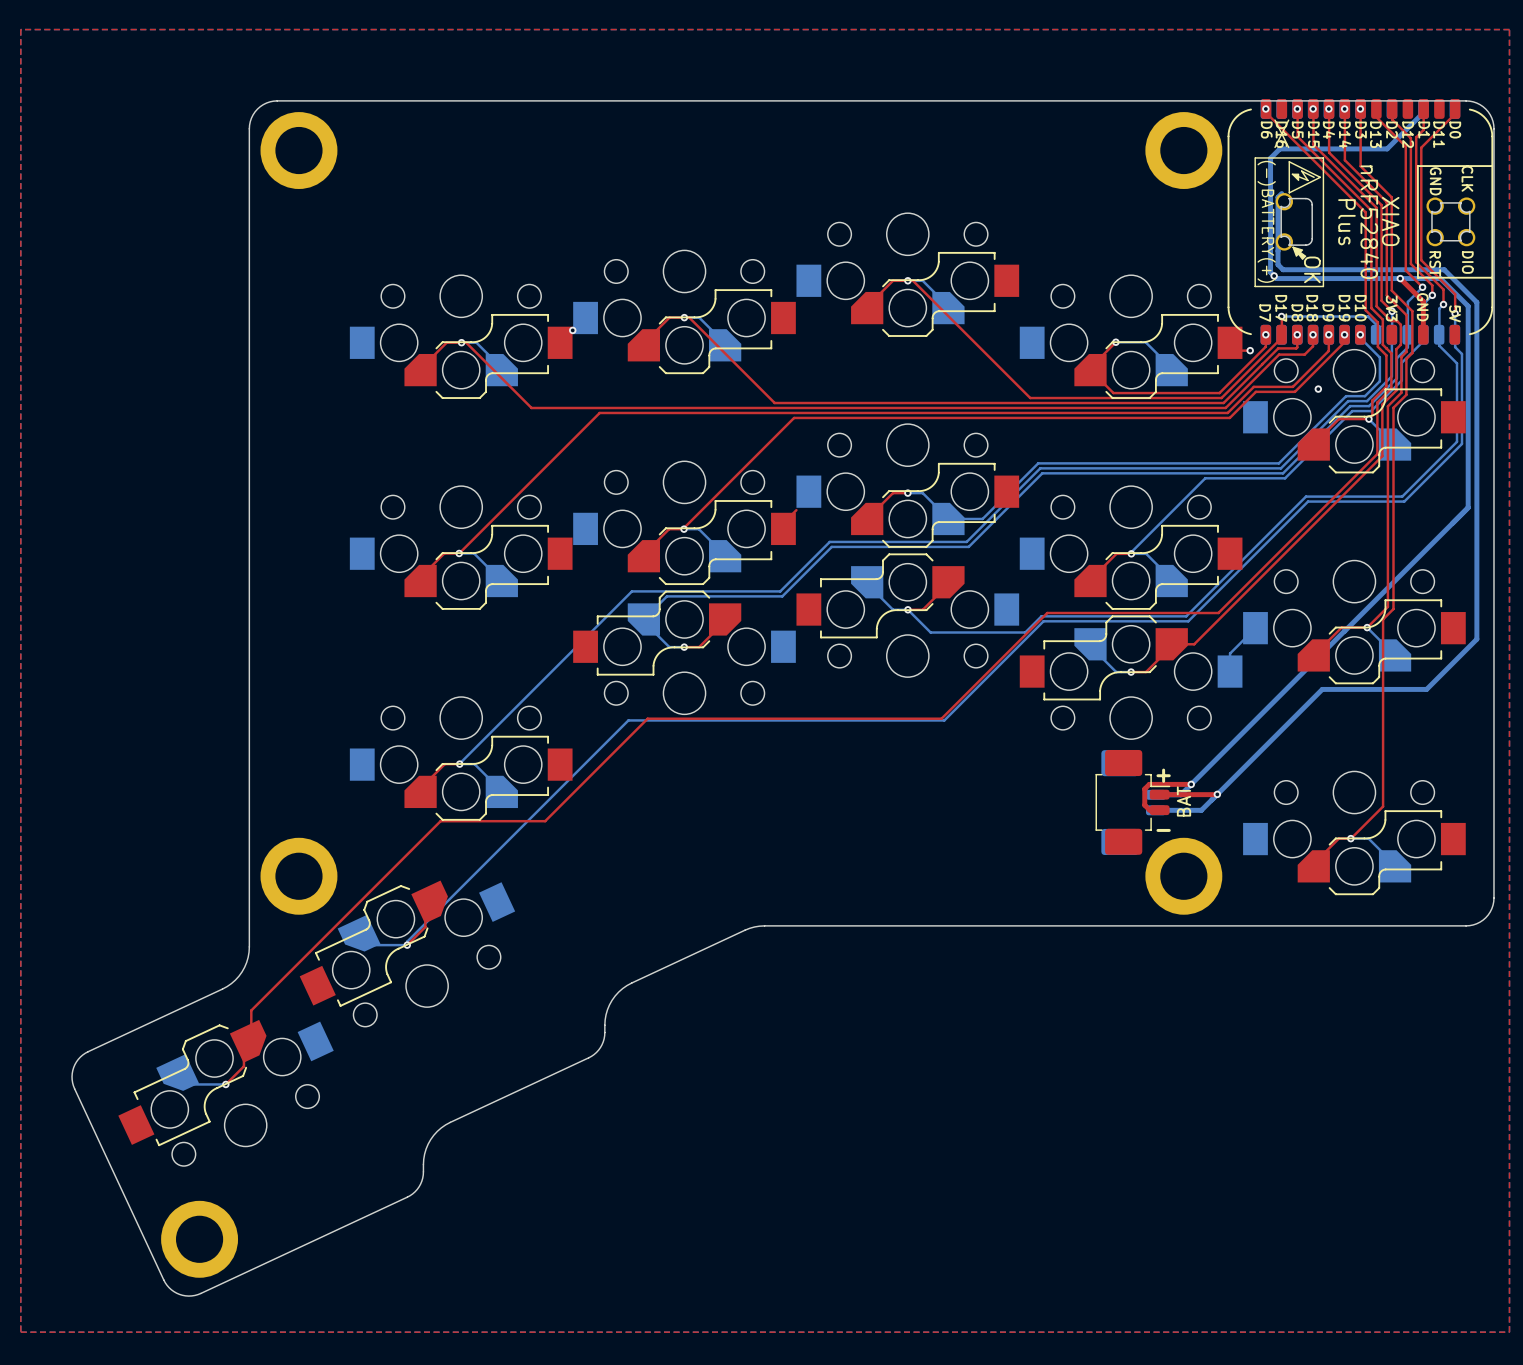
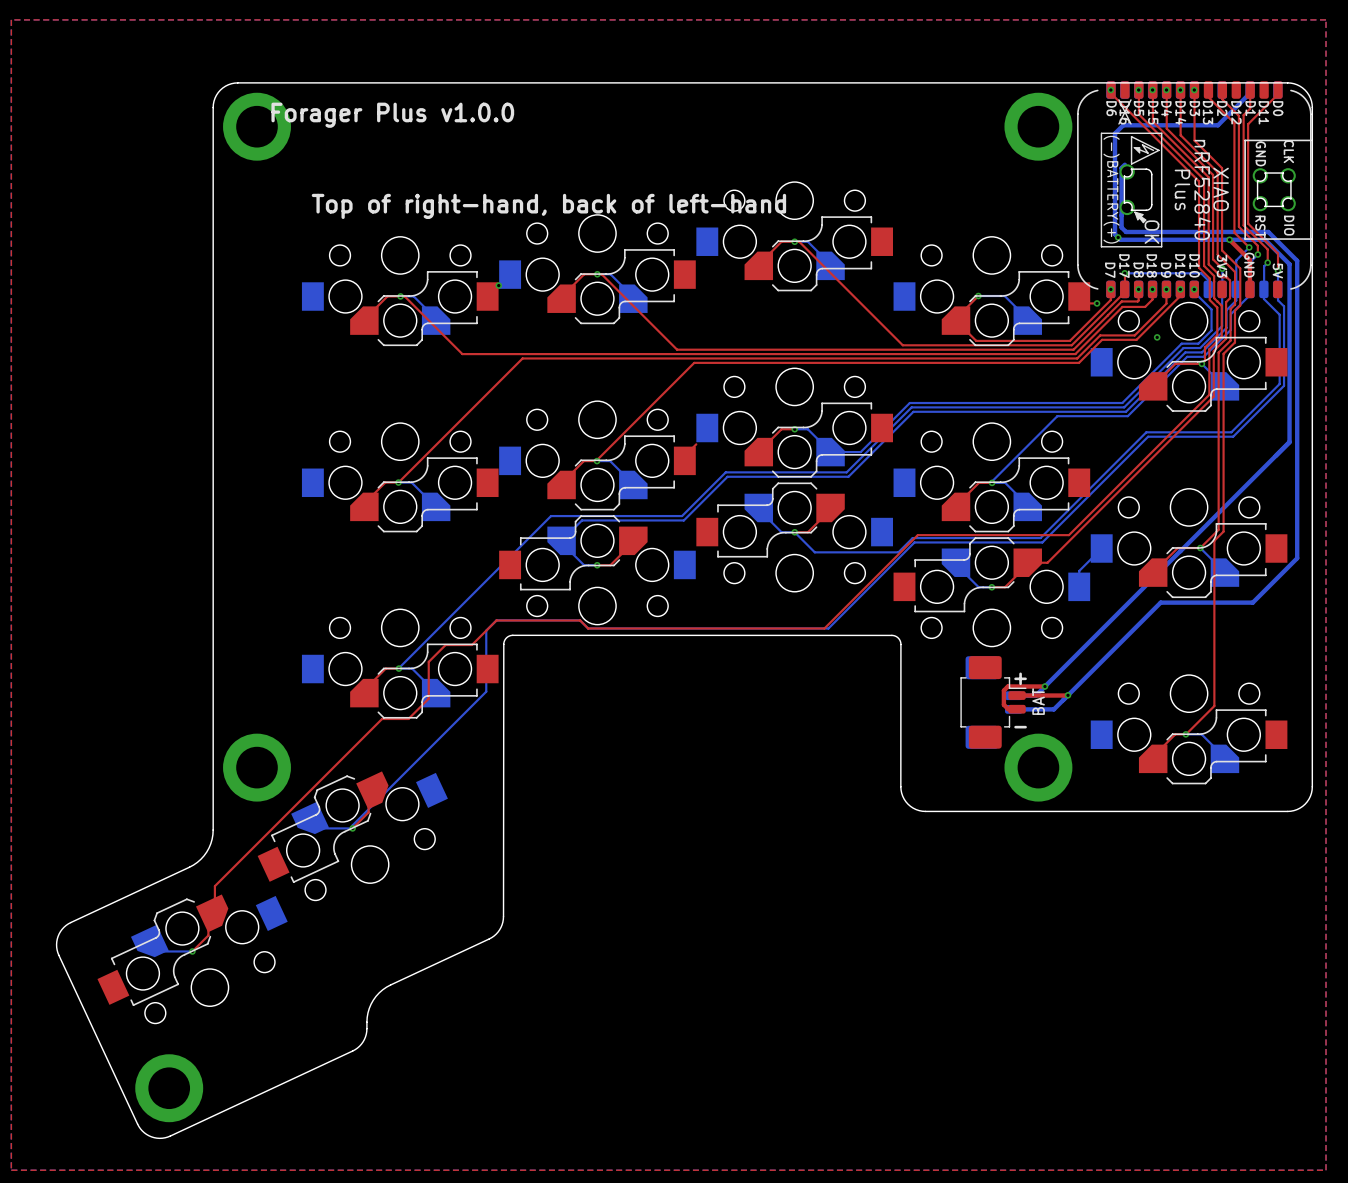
text: none -> Forager Plus v1.0.0 (392, 115)
text: none -> Top of right-hand, back of left-hand (548, 206)
top track: (673, 718) (647, 718) (545, 821) (470, 821) -> (588, 628) (580, 620) (496, 620) (471, 645) (445, 645) (428, 661) (428, 698) (408, 718)
bottom track: (946, 718) (944, 720) (628, 720) (558, 790) -> (828, 628) (588, 628) (580, 620) (496, 620) (486, 630) (486, 691)
board edge: none -> (900, 644) (901, 789) (904, 799) (910, 806) (925, 811)
board edge: (1055, 925) (764, 925) (749, 928) (622, 988) (612, 1000) (607, 1009) (604, 1038) (598, 1050) (591, 1056) (561, 1070) -> (900, 644) (898, 638) (891, 635) (512, 635) (507, 637) (503, 644) (503, 916) (499, 929) (489, 938)

